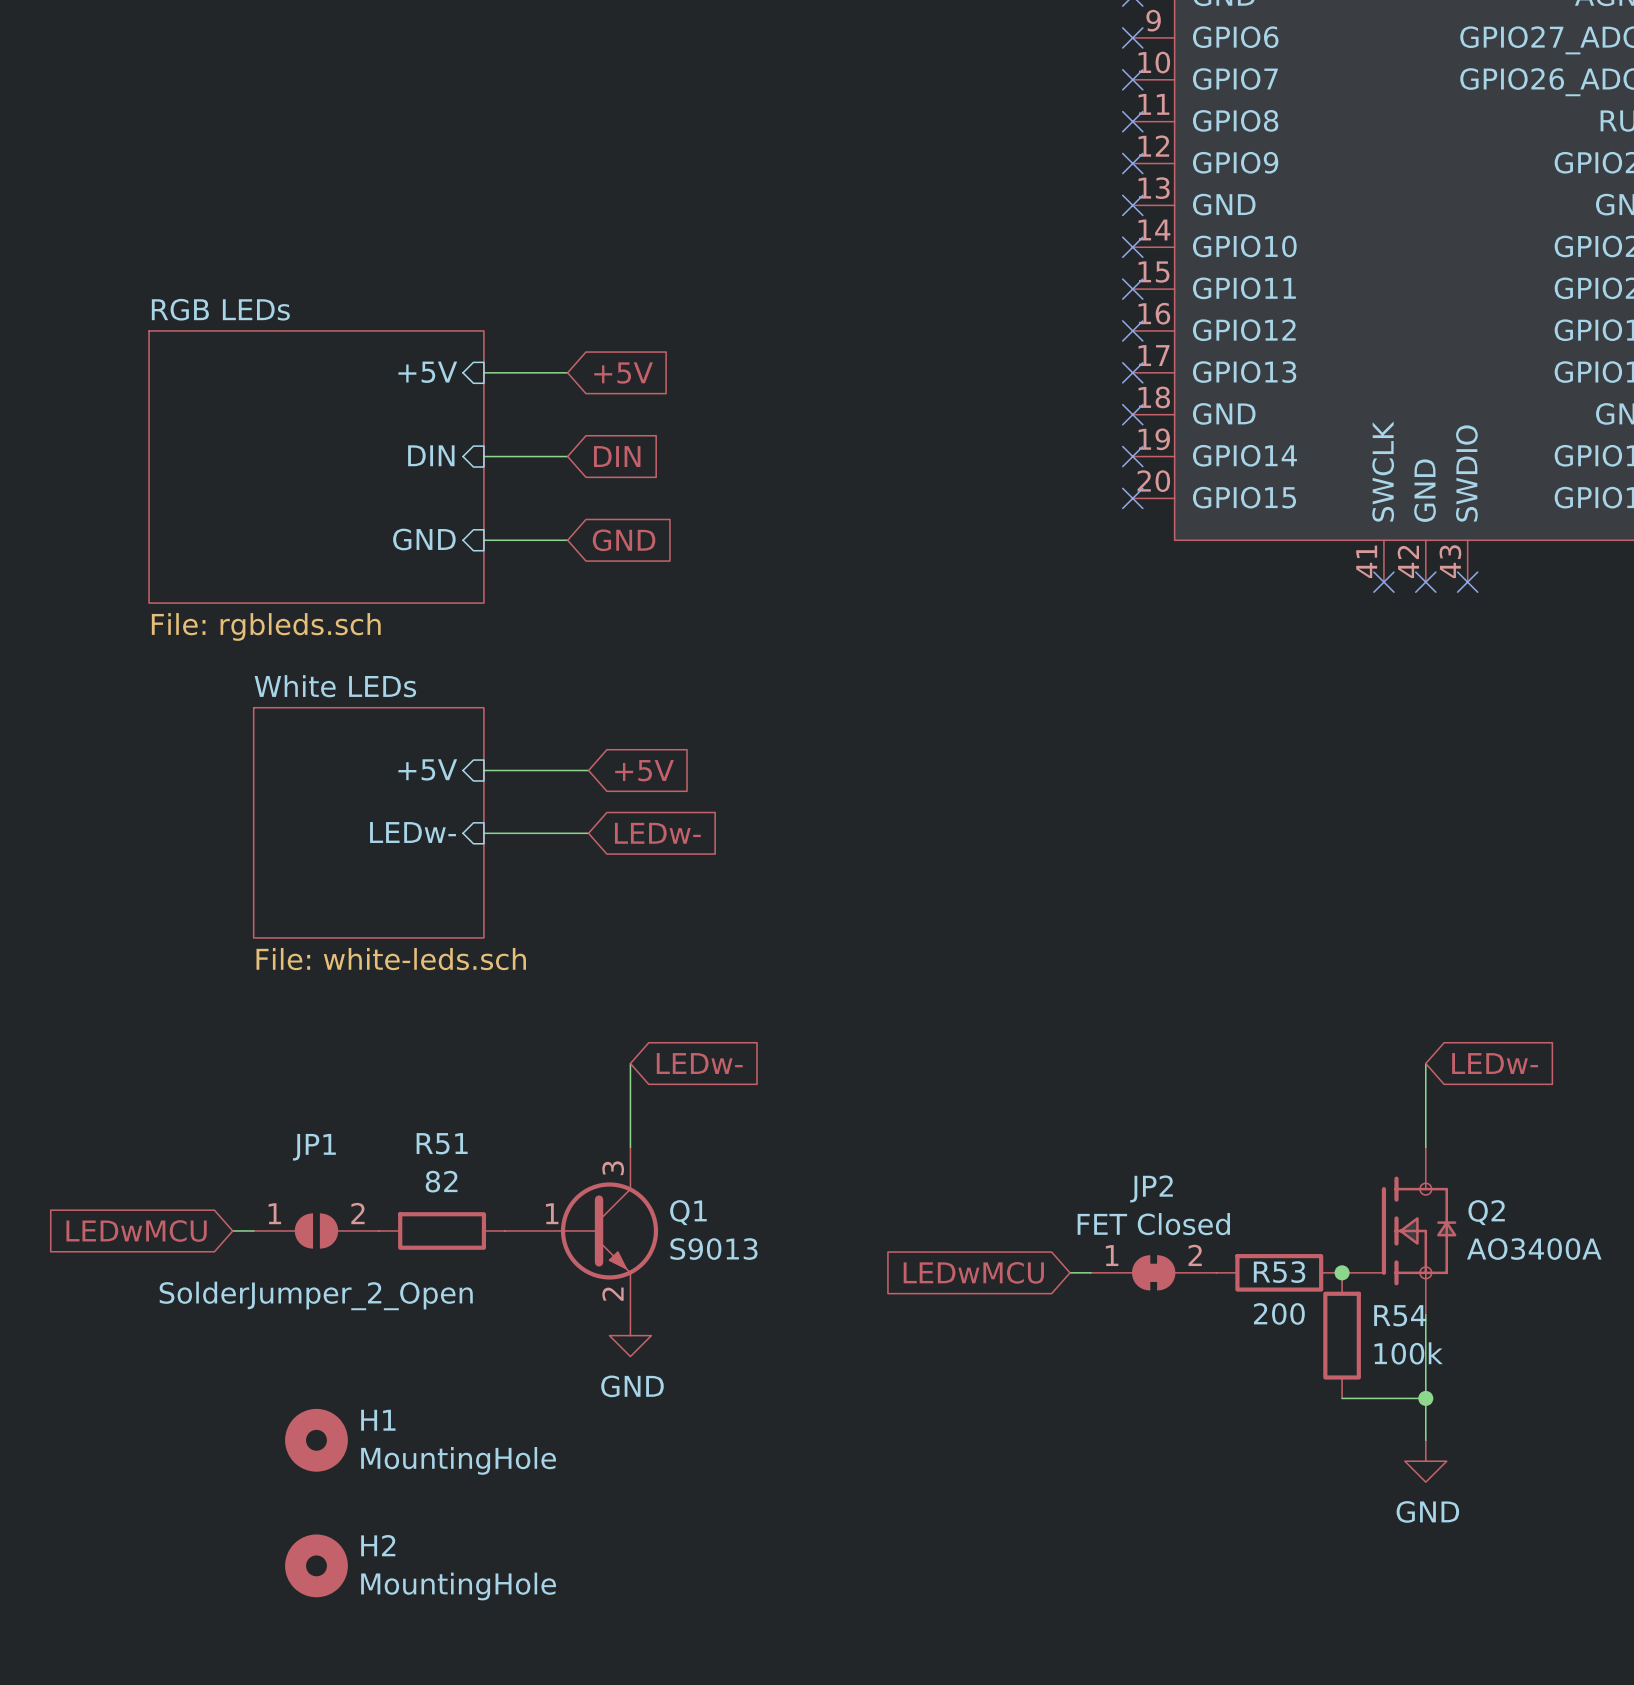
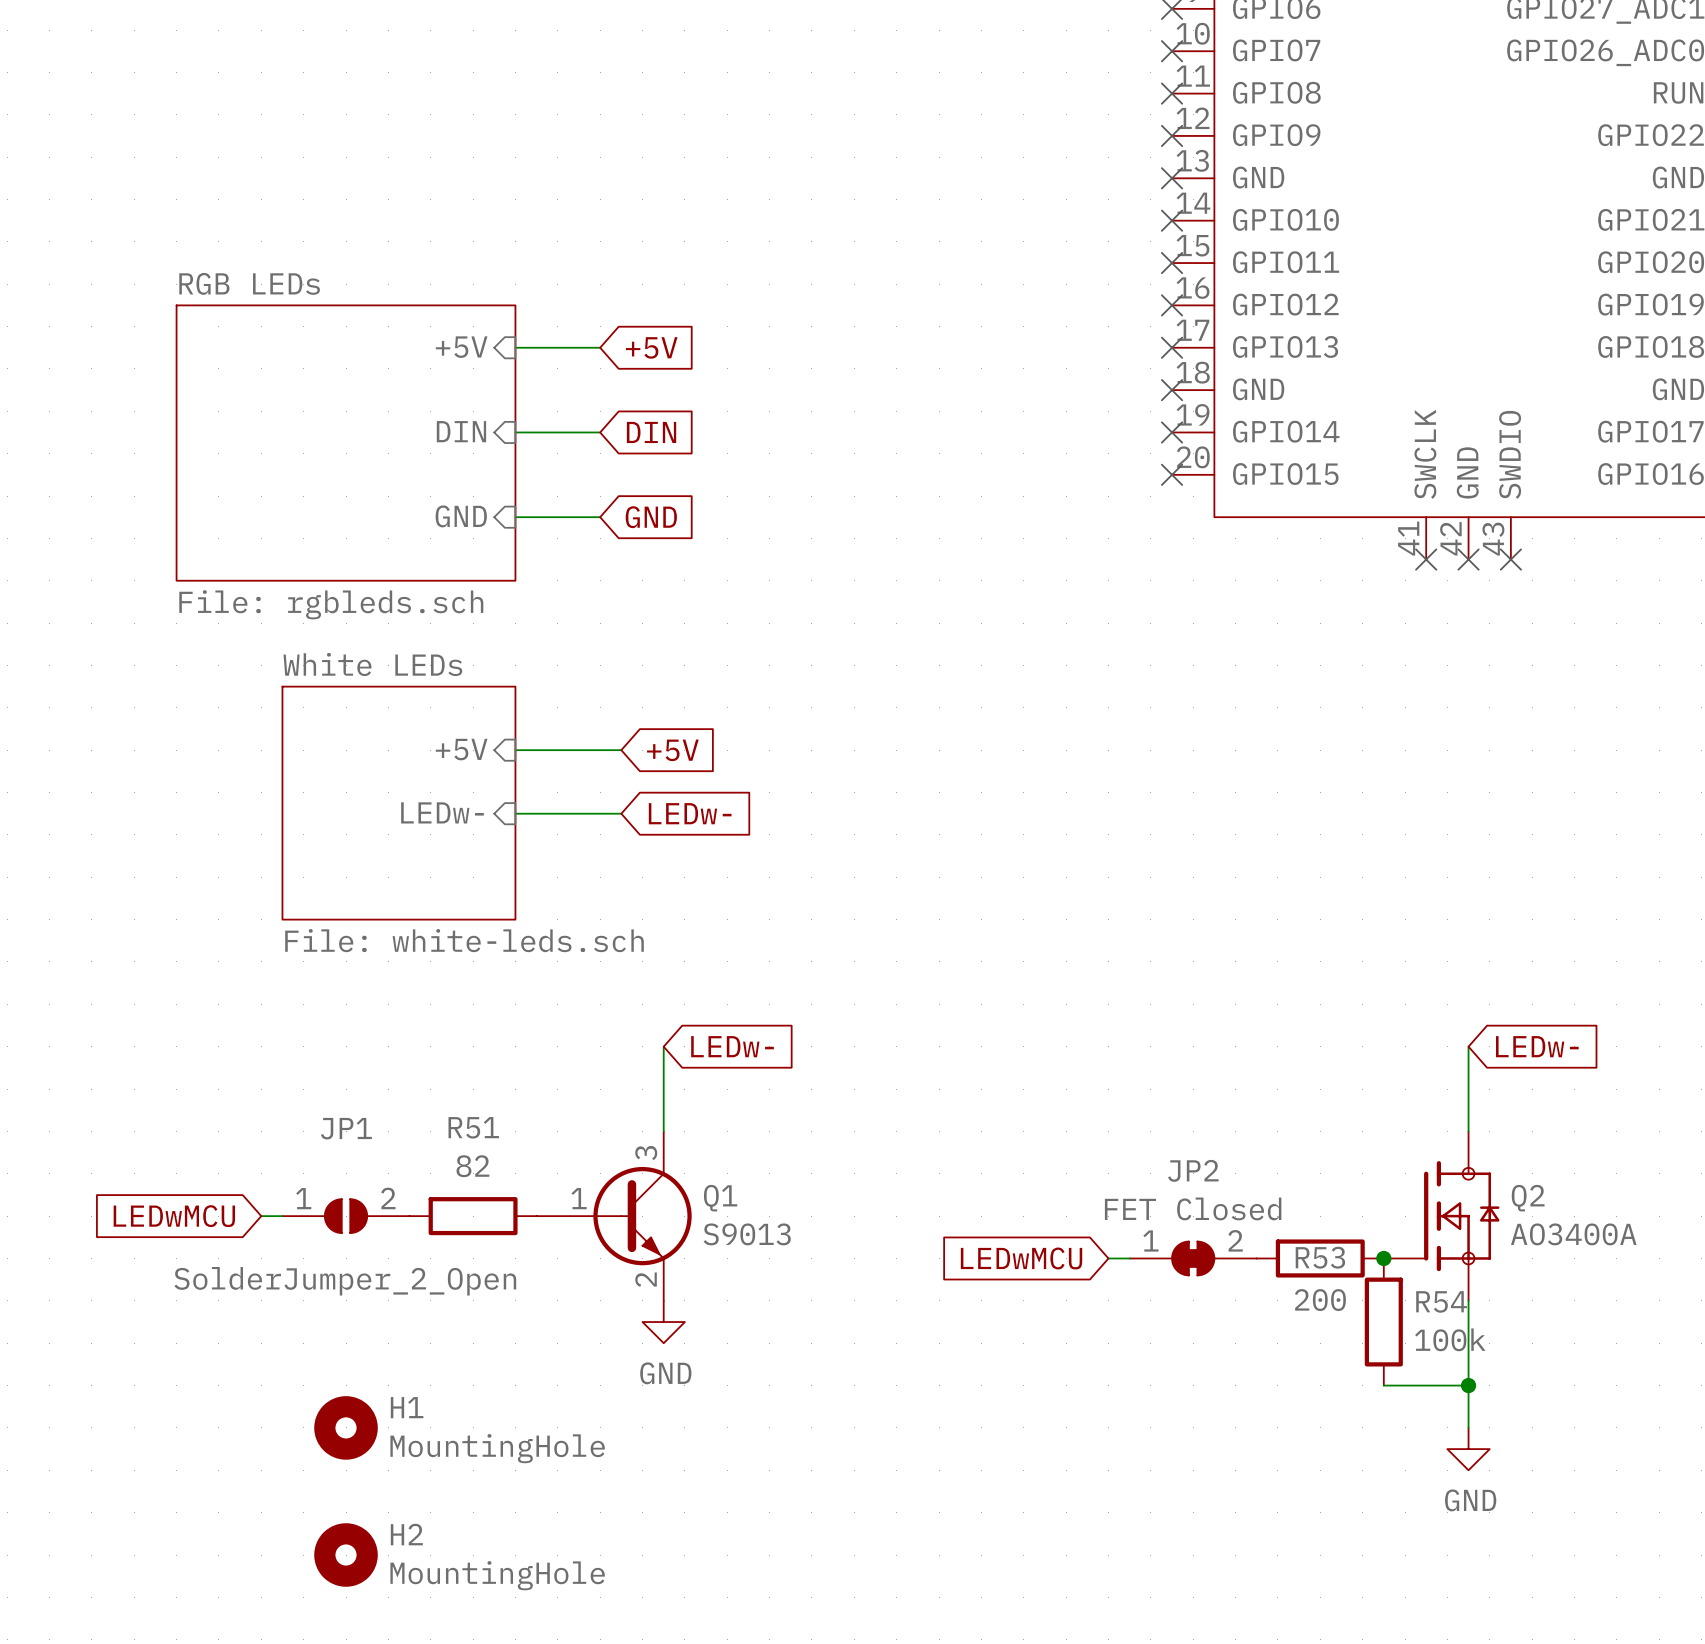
Q1 symbol: [504, 1147, 659, 1315] -> [536, 1131, 692, 1301]

